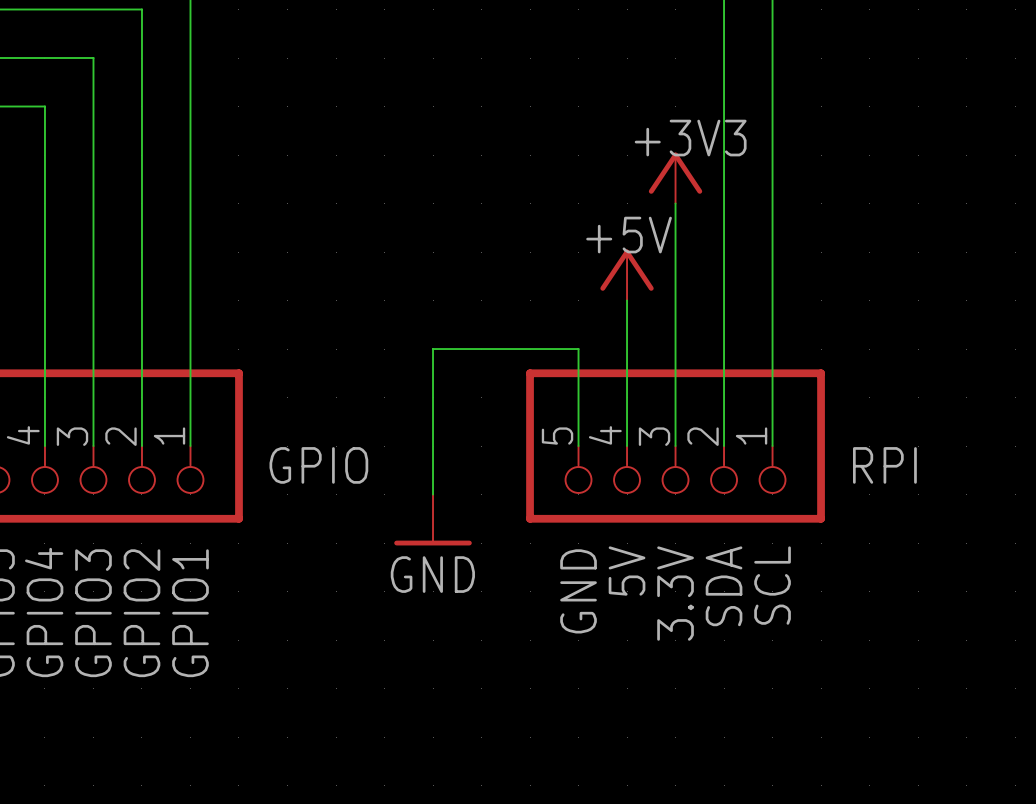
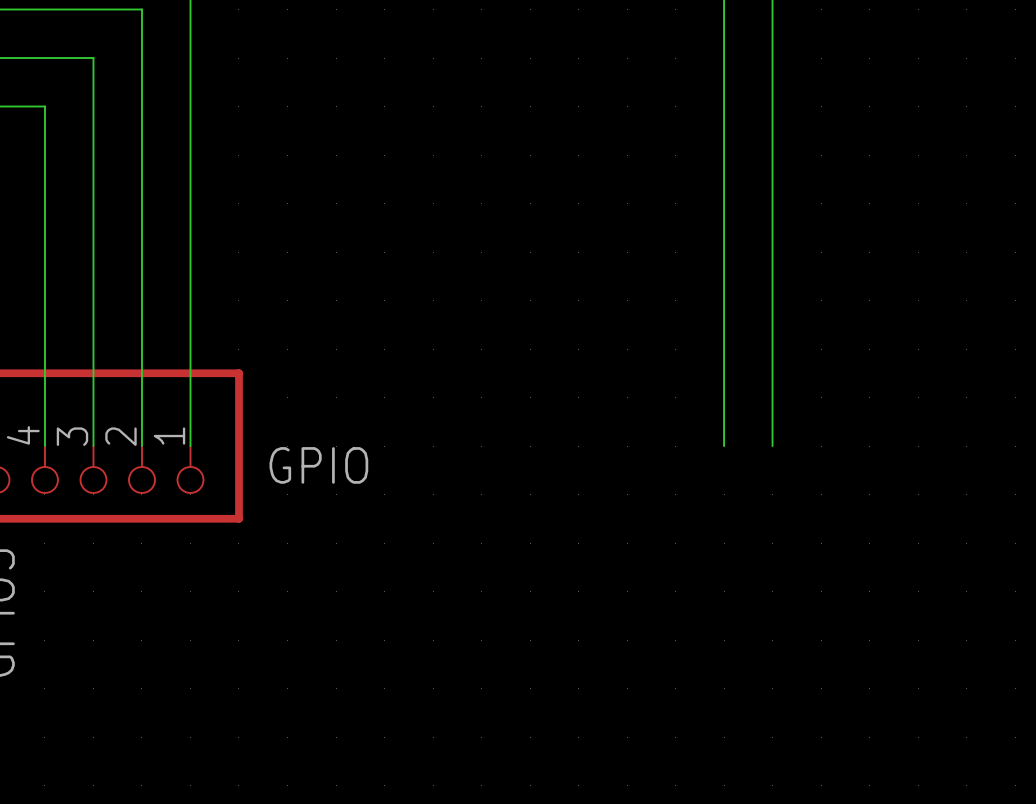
power symbol: +3V3 (675, 178) -> none
wire: (675, 203) (675, 446) -> none
power symbol: +5V (627, 275) -> none
wire: (627, 300) (627, 446) -> none
wire: (578, 446) (578, 349) (433, 349) (433, 494) -> none
RPI: (675, 446) -> none
power symbol: GND (433, 519) -> none
text: 5V (627, 571) -> none
text: SCL (772, 585) -> none
text: SDA (724, 586) -> none
text: GND (578, 591) -> none
text: 3.3V (675, 593) -> none
text: GPIO4 (44, 612) -> none
text: GPIO3 (93, 613) -> none
text: GPIO2 (141, 613) -> none
text: GPIO1 (190, 613) -> none

